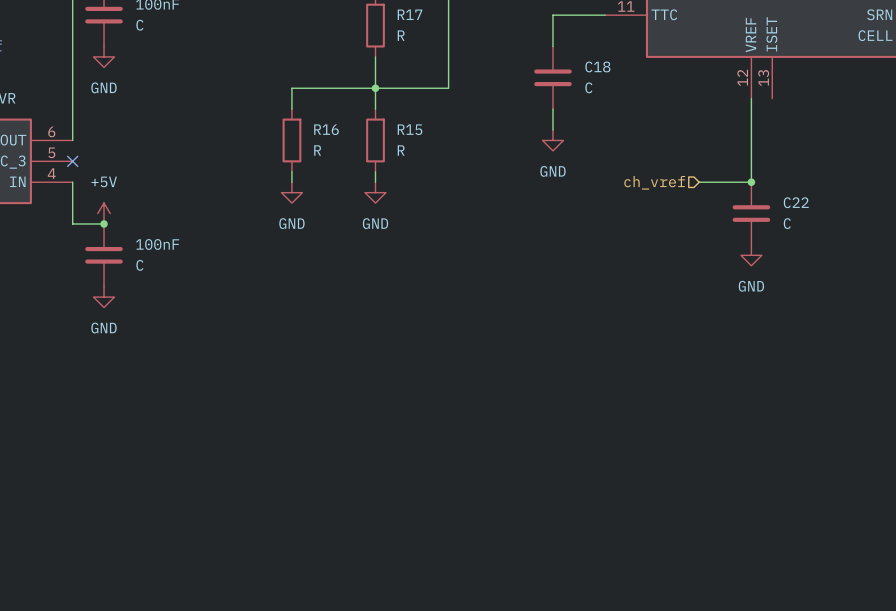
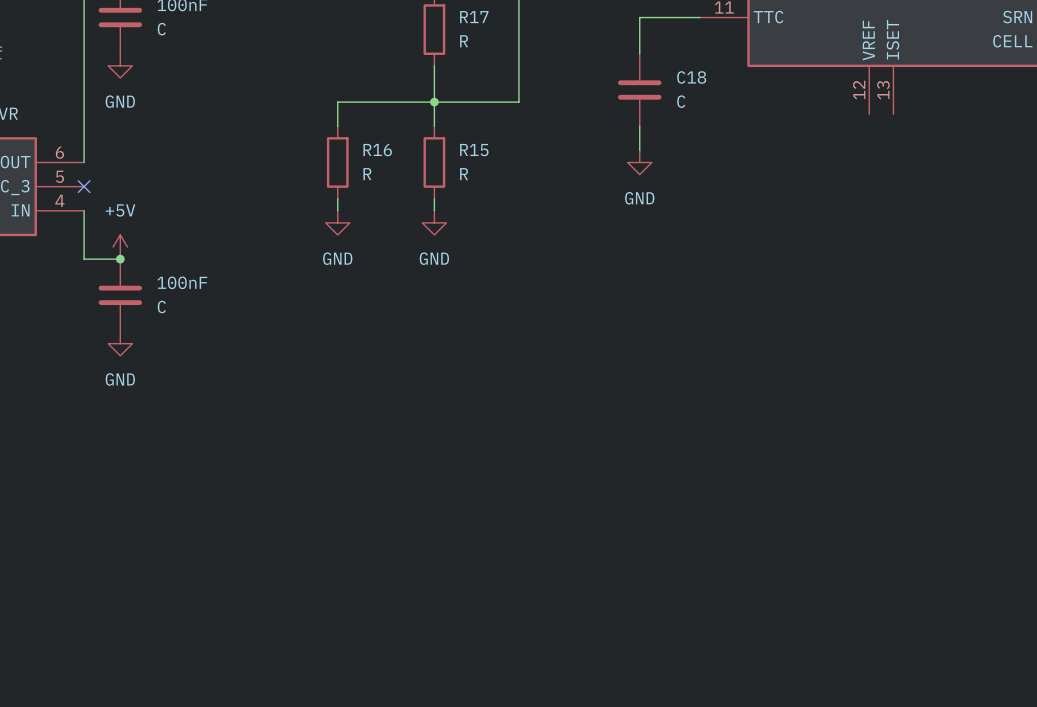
wire: (751, 98) (751, 182) (699, 182) -> none
hierarchical label: ch_vref (654, 182) -> none
junction: (751, 182) -> none
C22: C (751, 213) -> none
power symbol: GND (751, 255) -> none

